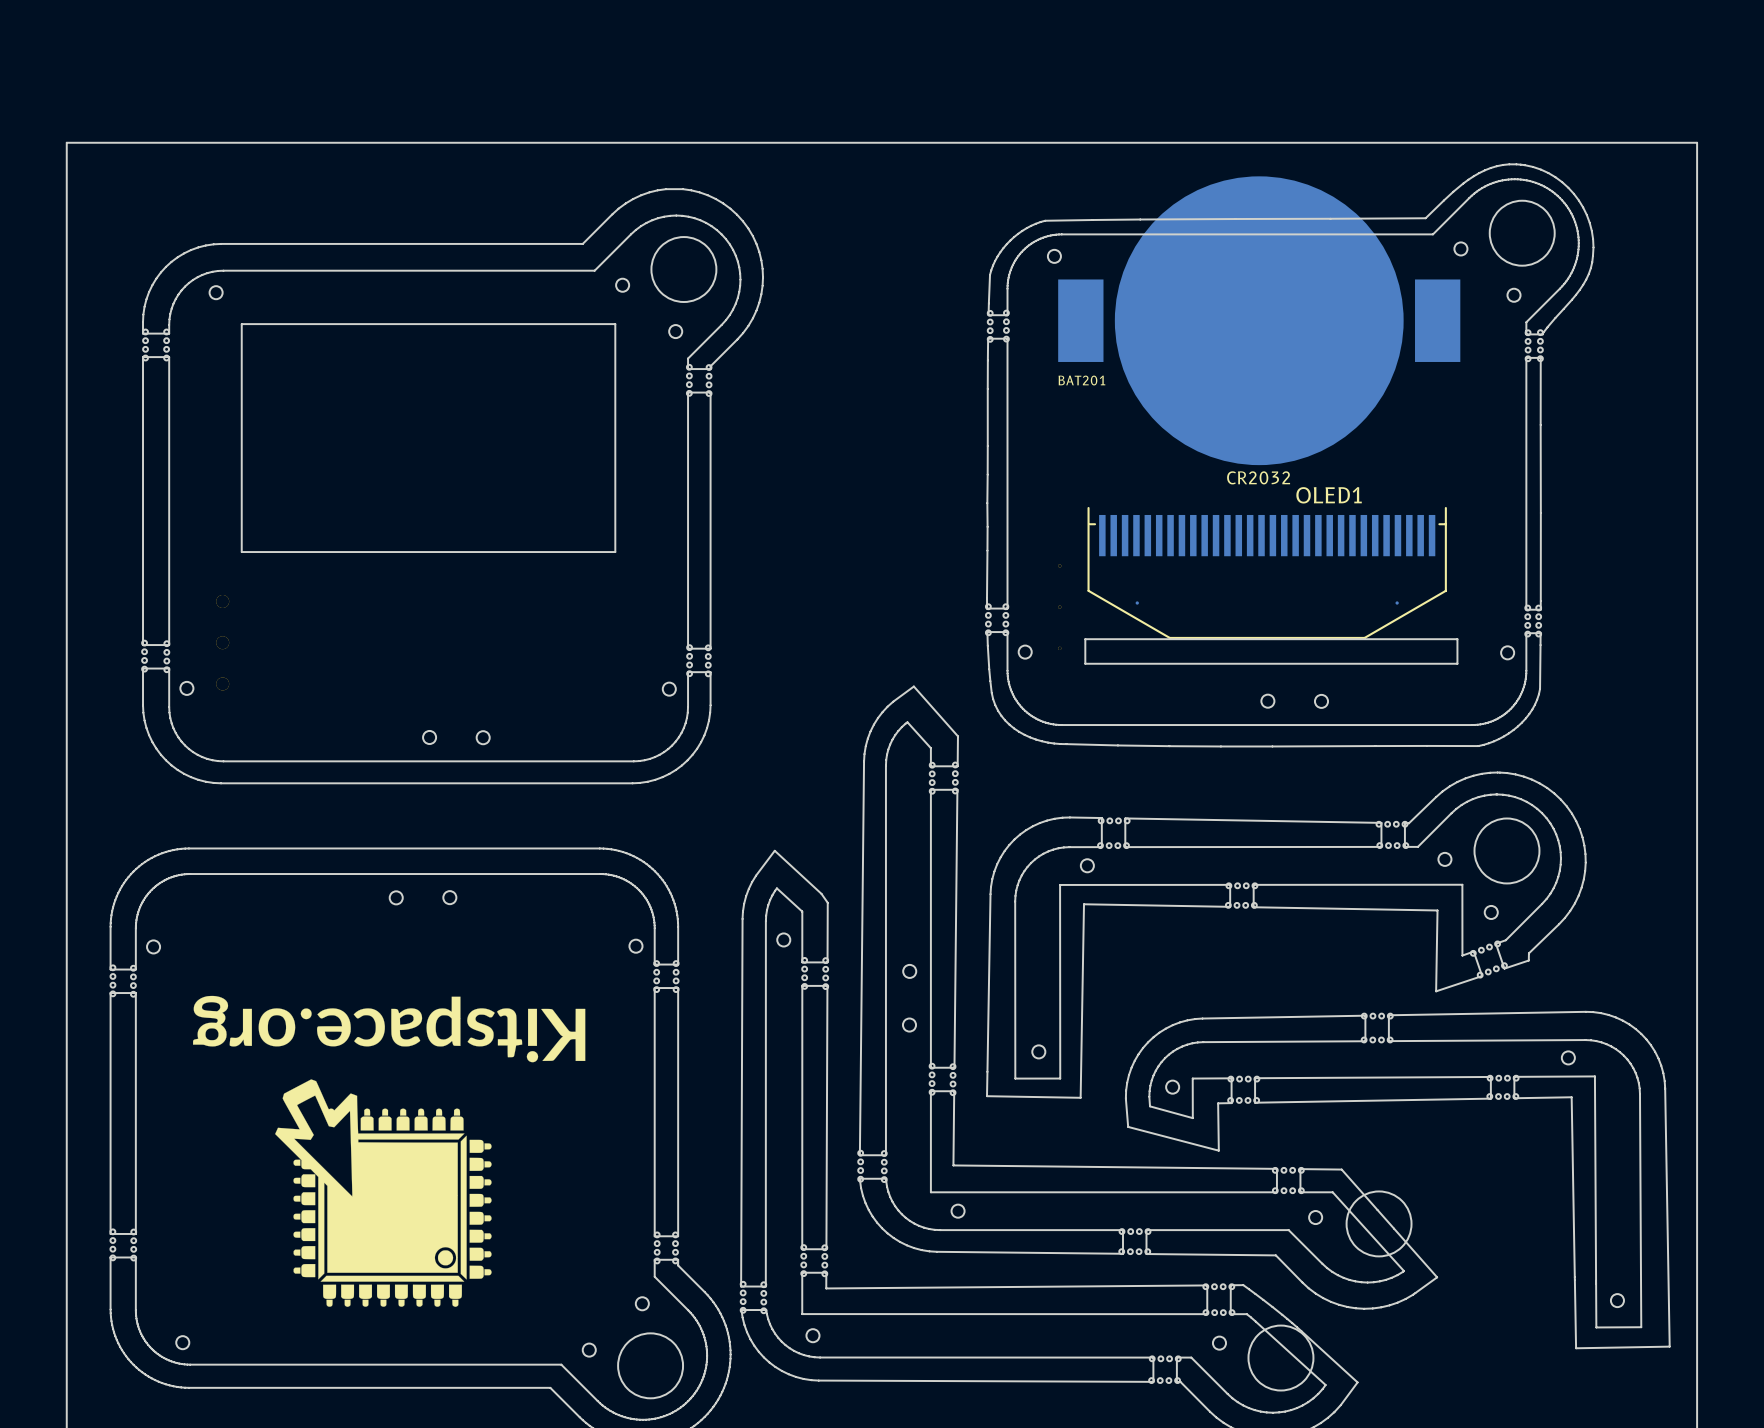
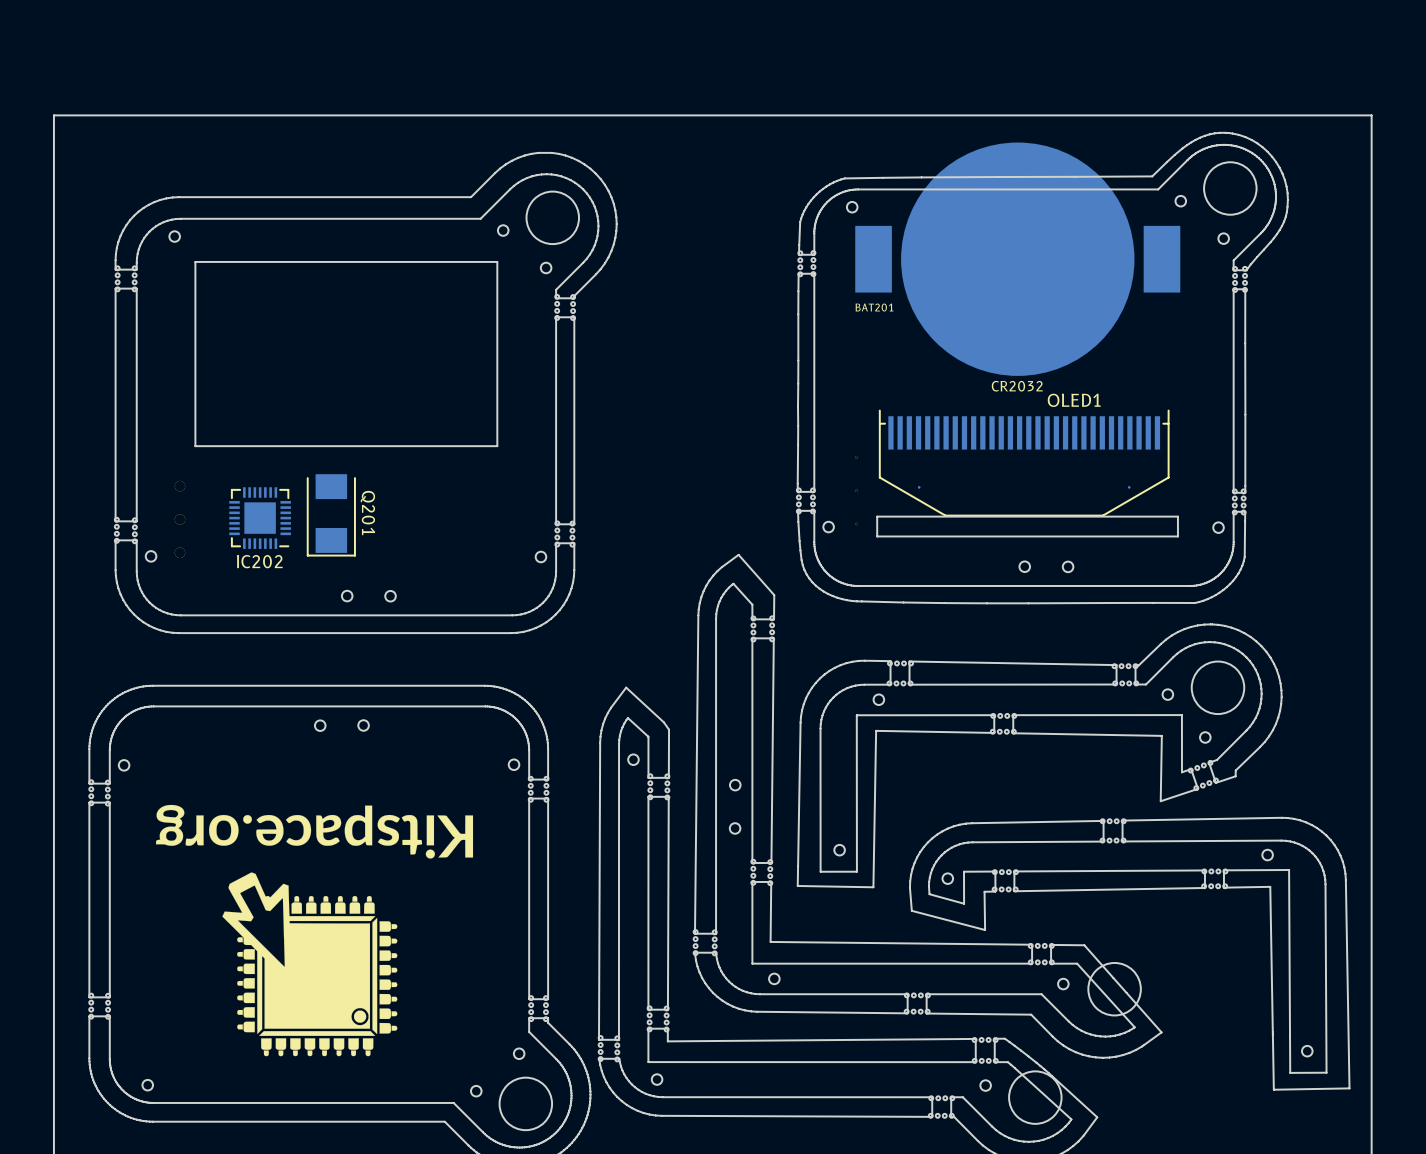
Q201: none -> (331, 515)
IC202: none -> (260, 518)

